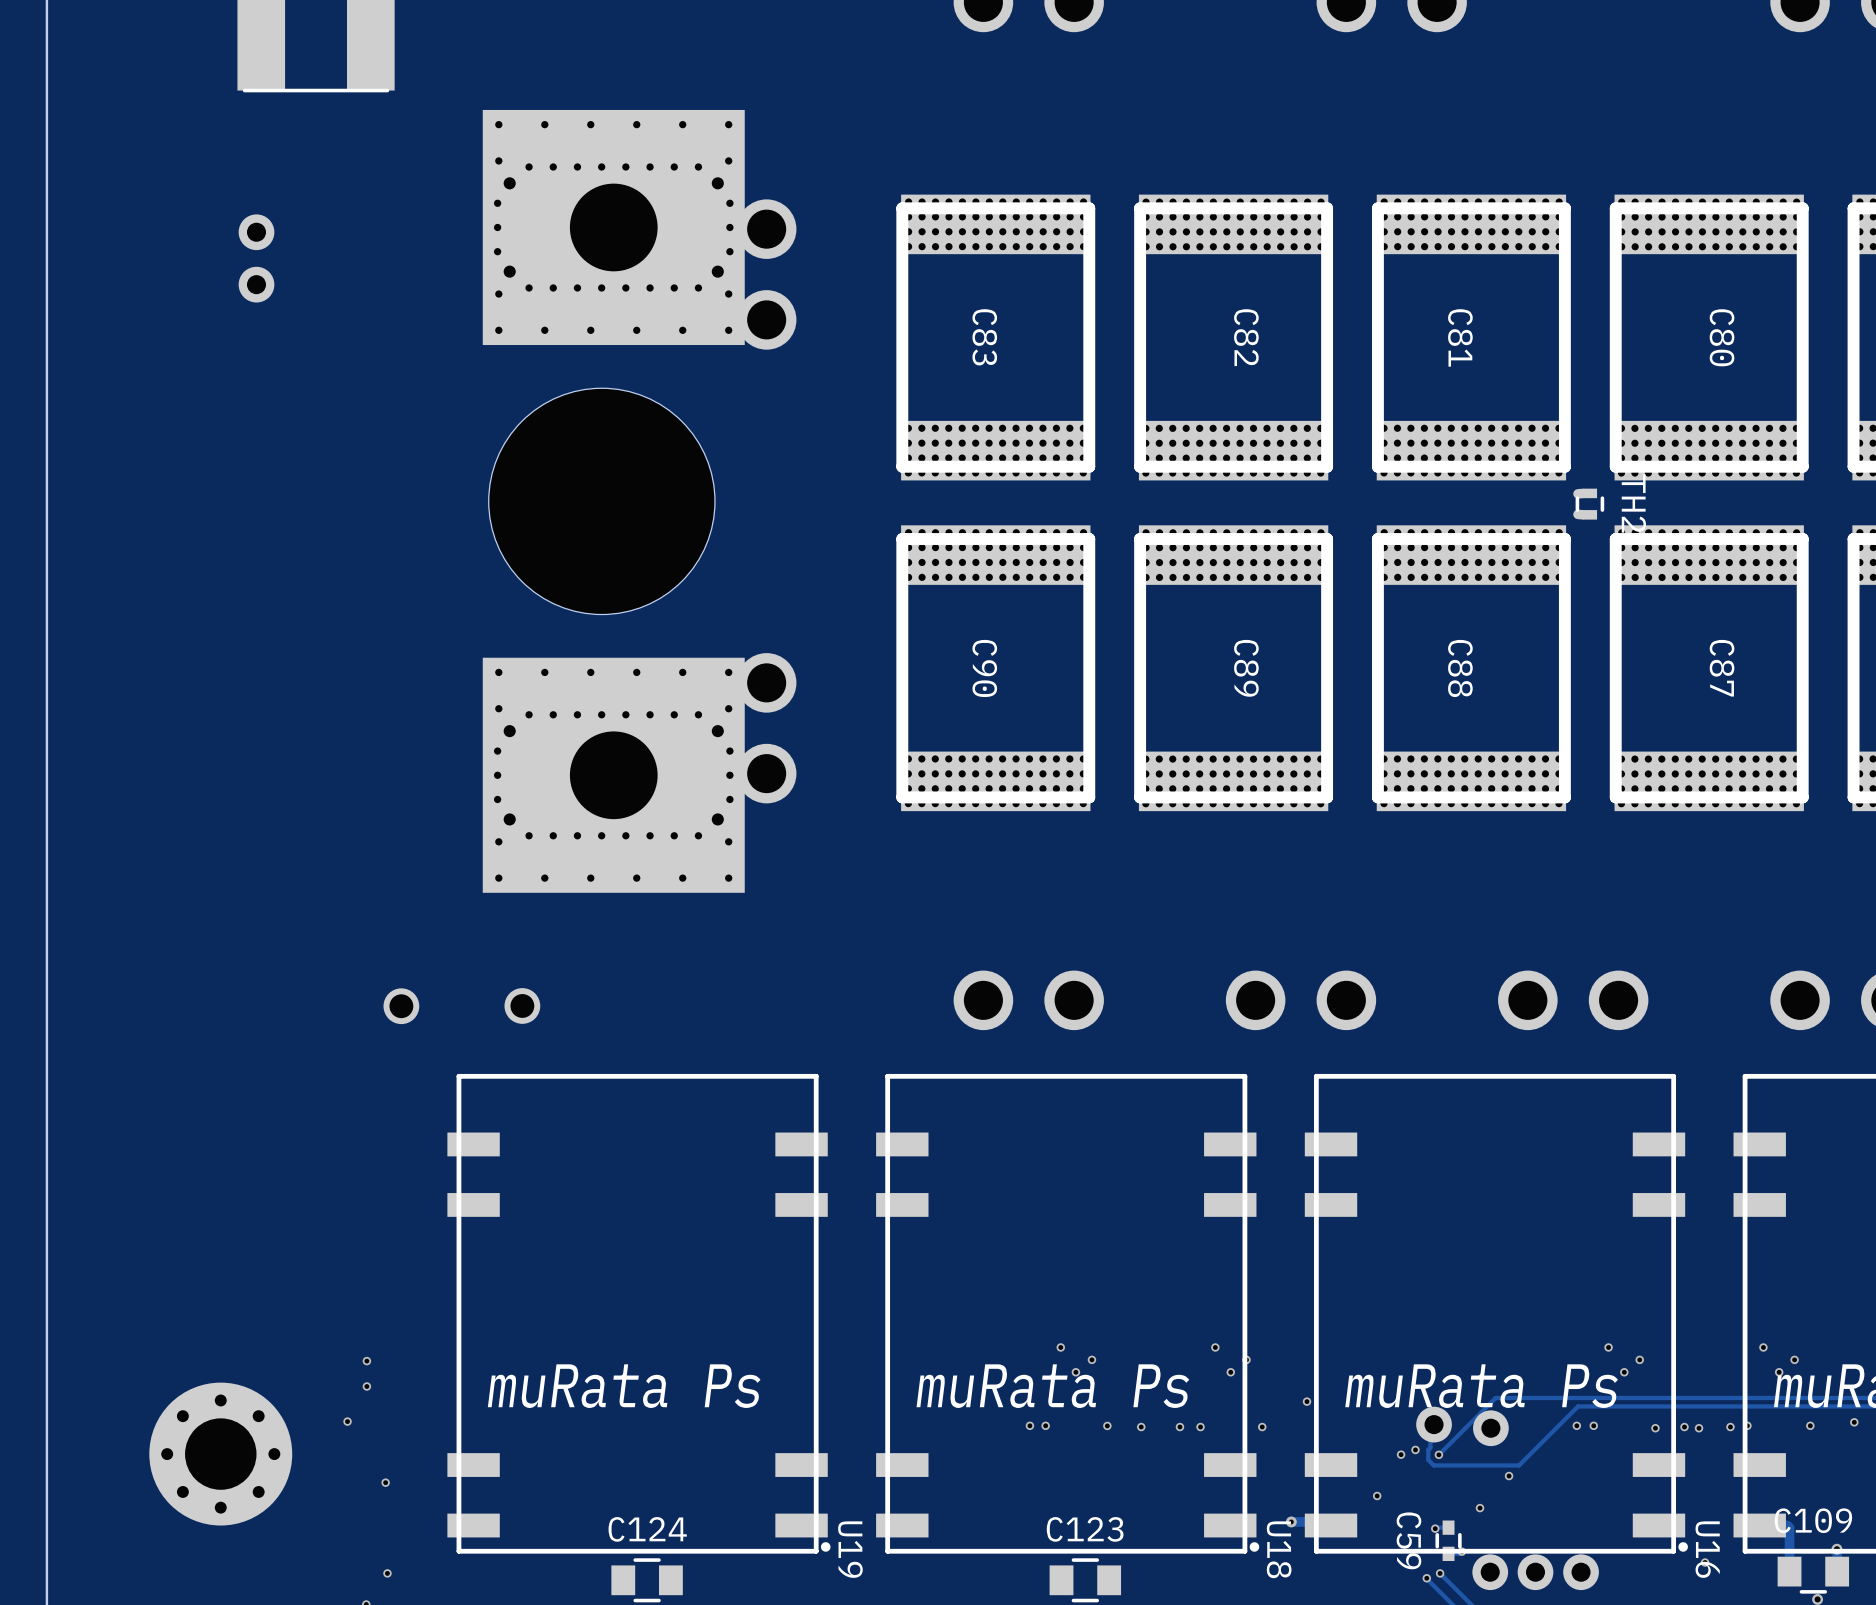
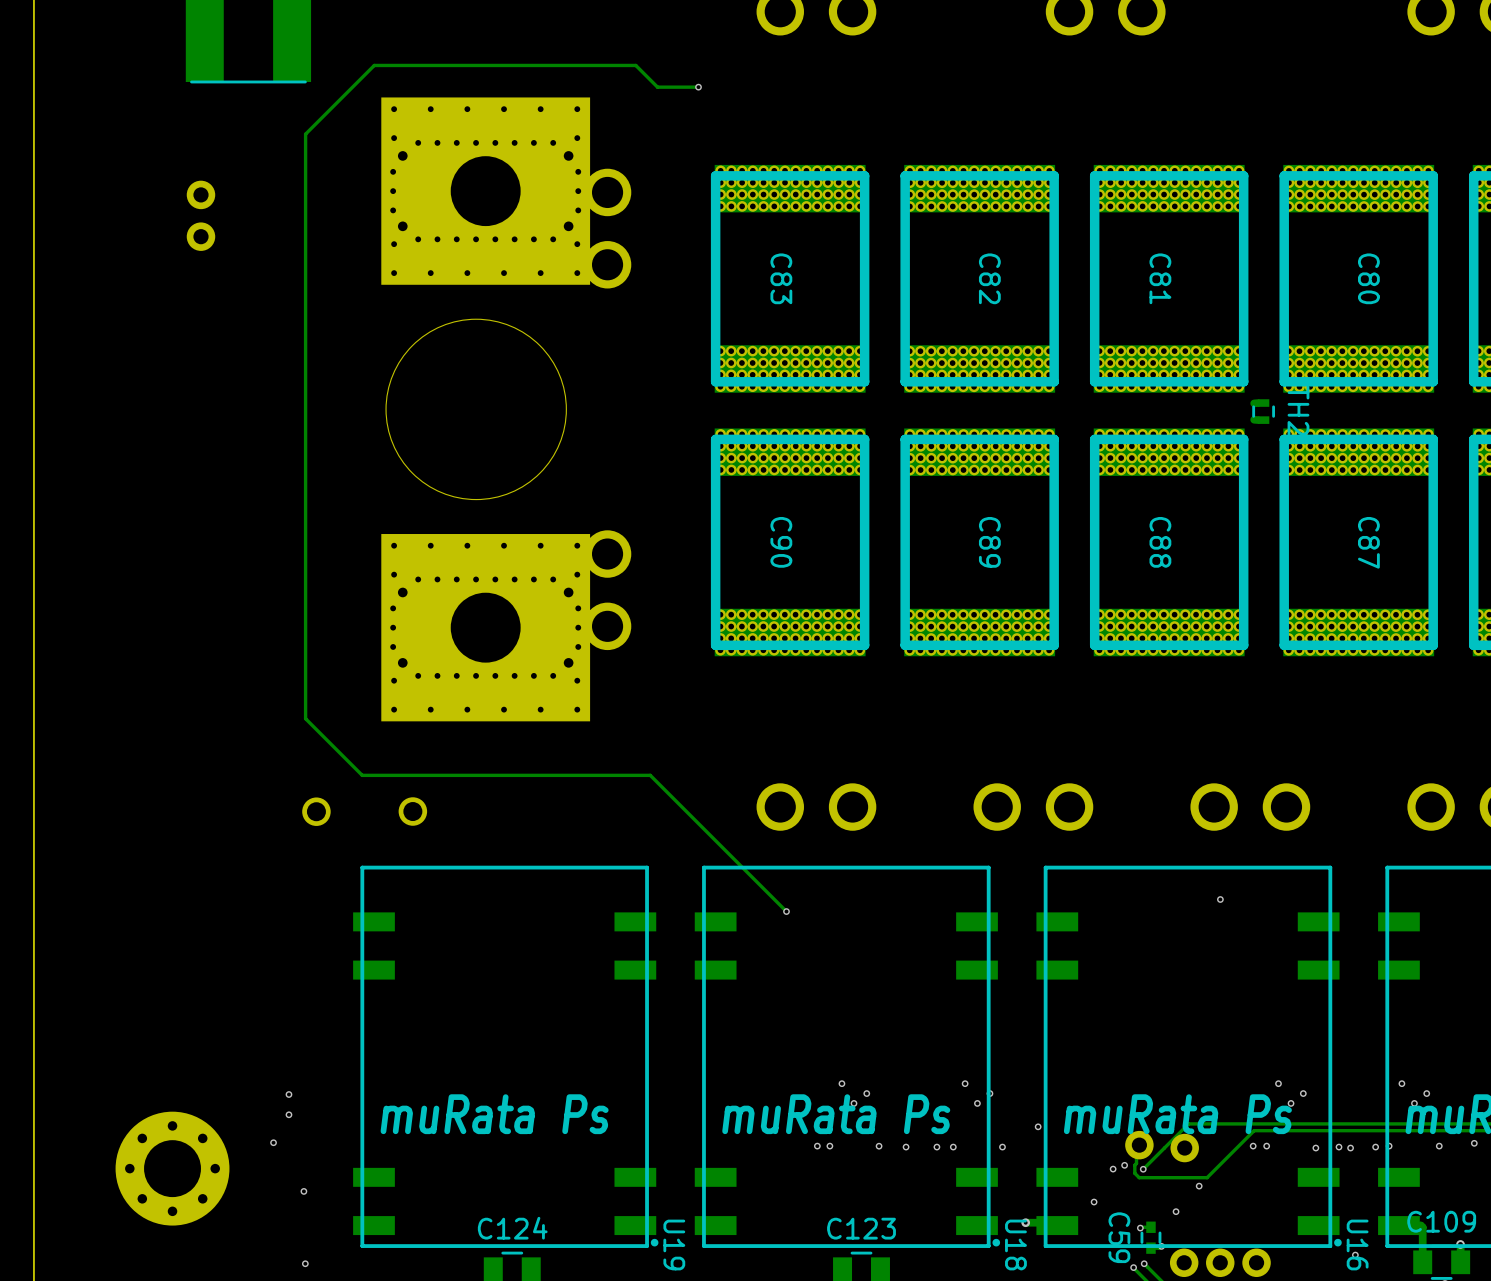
track: none -> (698, 87) (657, 87) (635, 65) (374, 65) (305, 134) (305, 718) (362, 775) (650, 775) (786, 911)
via: none -> (698, 87)
via: none -> (1220, 899)
via: none -> (786, 911)

